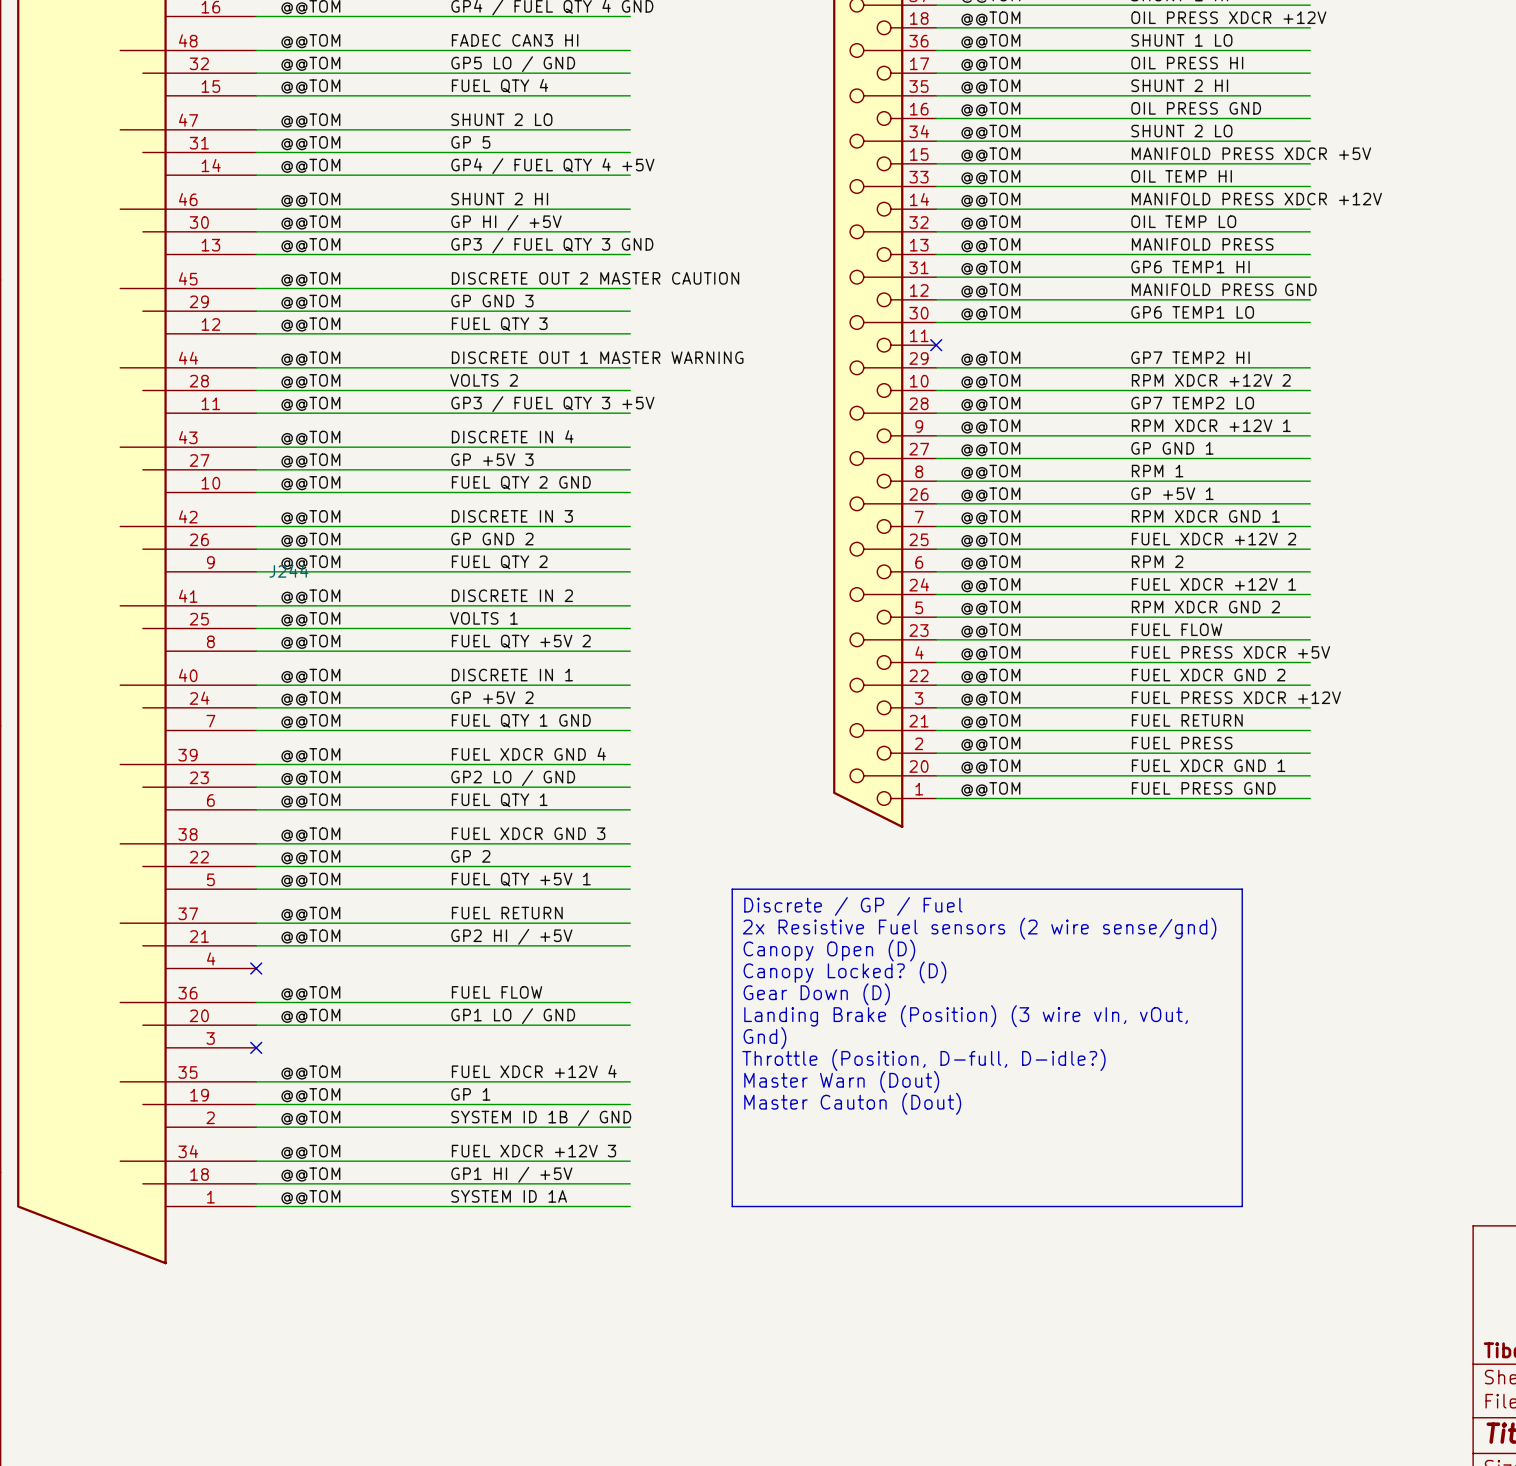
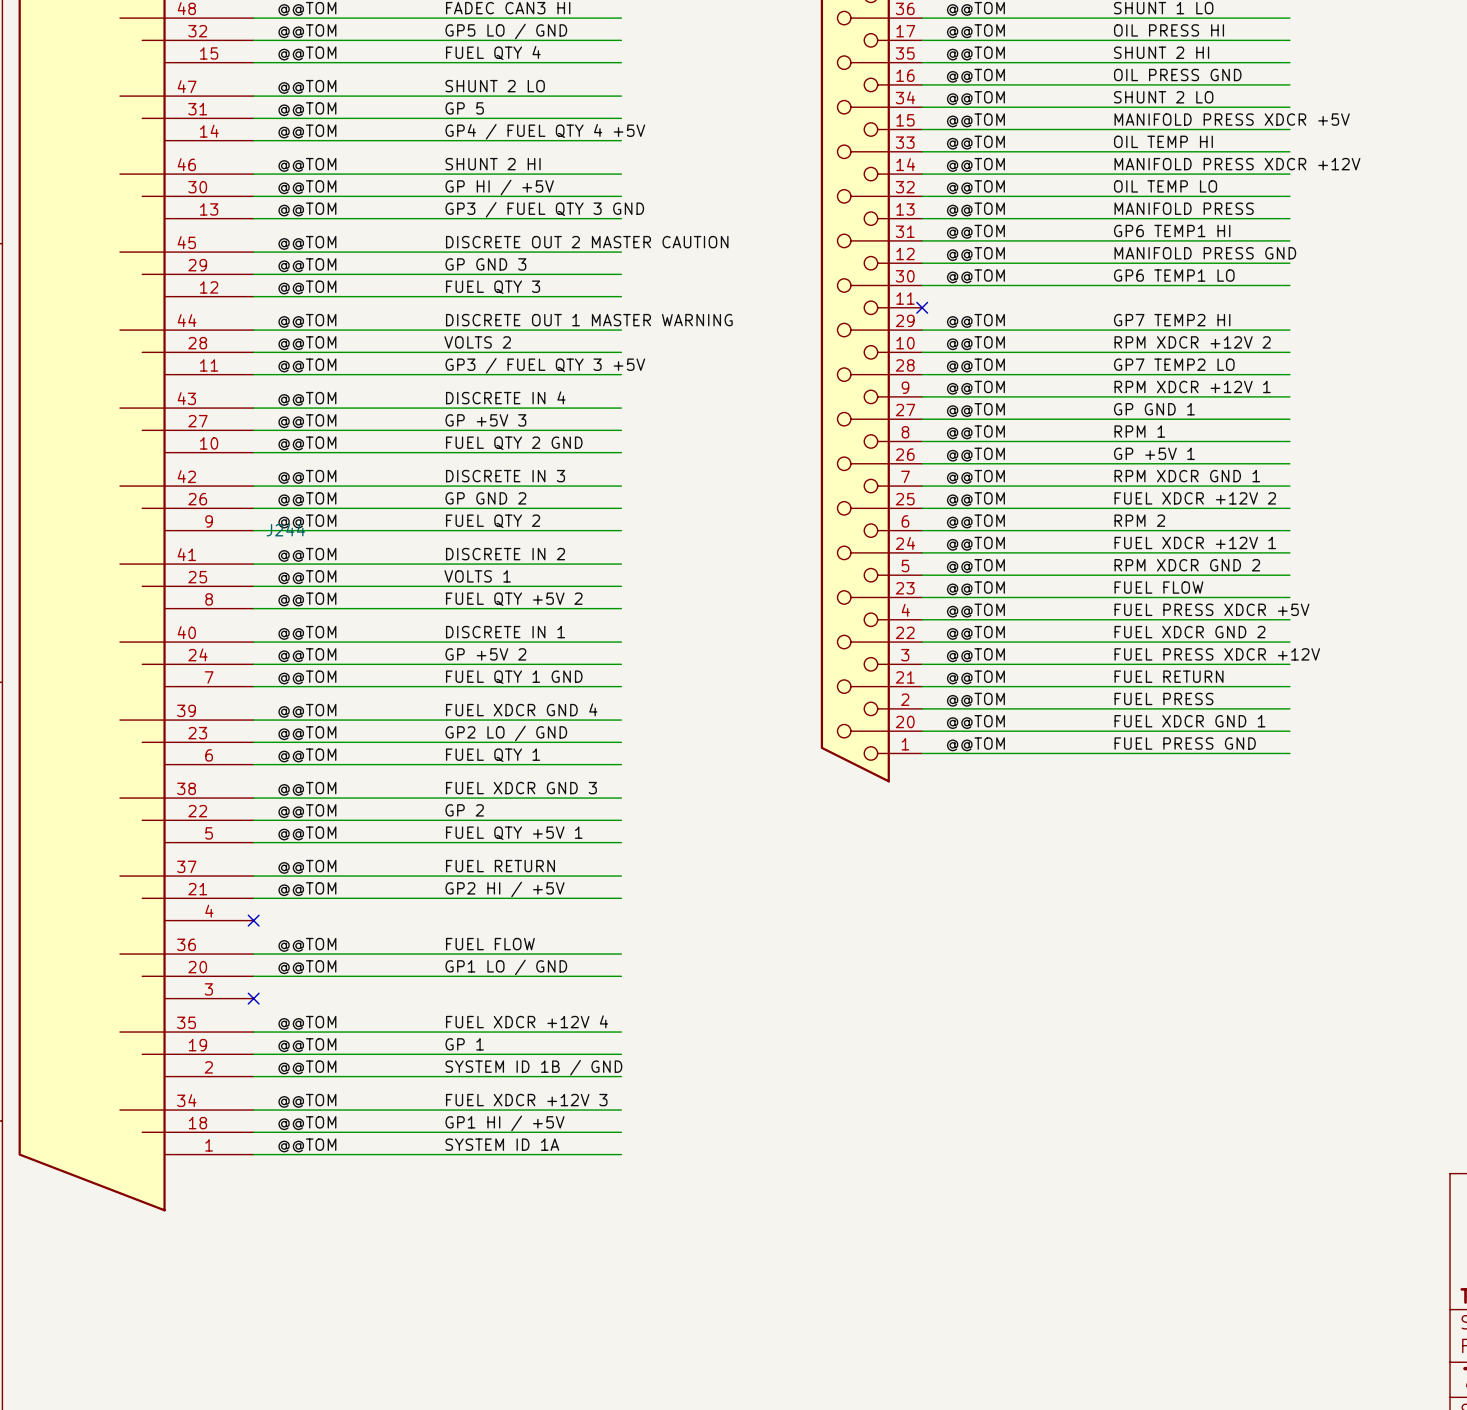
line: (732, 889) (1242, 889) (1242, 1206) (732, 1206) (732, 889) -> none
text: Discrete / GP / Fuel (853, 906) -> none
text: 2x Resistive Fuel sensors (2 wire sense/gnd) (979, 928) -> none
text: Canopy Open (D) (829, 950) -> none
text: Canopy Locked? (D) (844, 972) -> none
text: Gear Down (D) (816, 994) -> none
text: Landing Brake (Position) (3 wire vIn, vOut, (966, 1016) -> none
text: Gnd) (764, 1038) -> none
text: Throttle (Position, D-full, D-idle?) (923, 1060) -> none
text: Master Warn (Dout) (841, 1081) -> none
text: Master Cauton (Dout) (852, 1103) -> none

